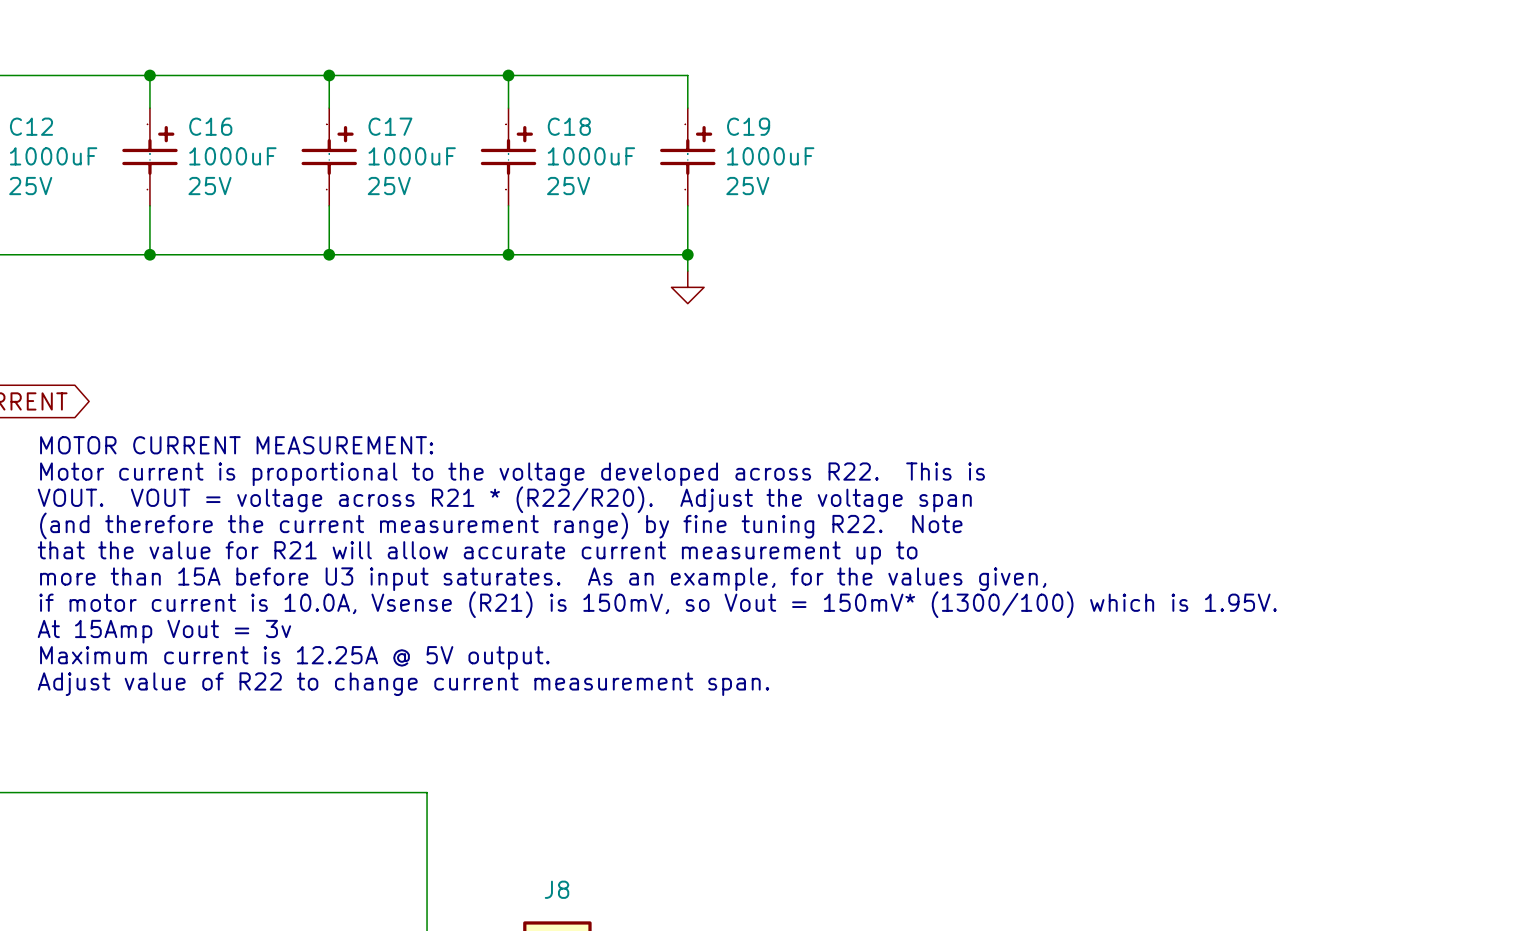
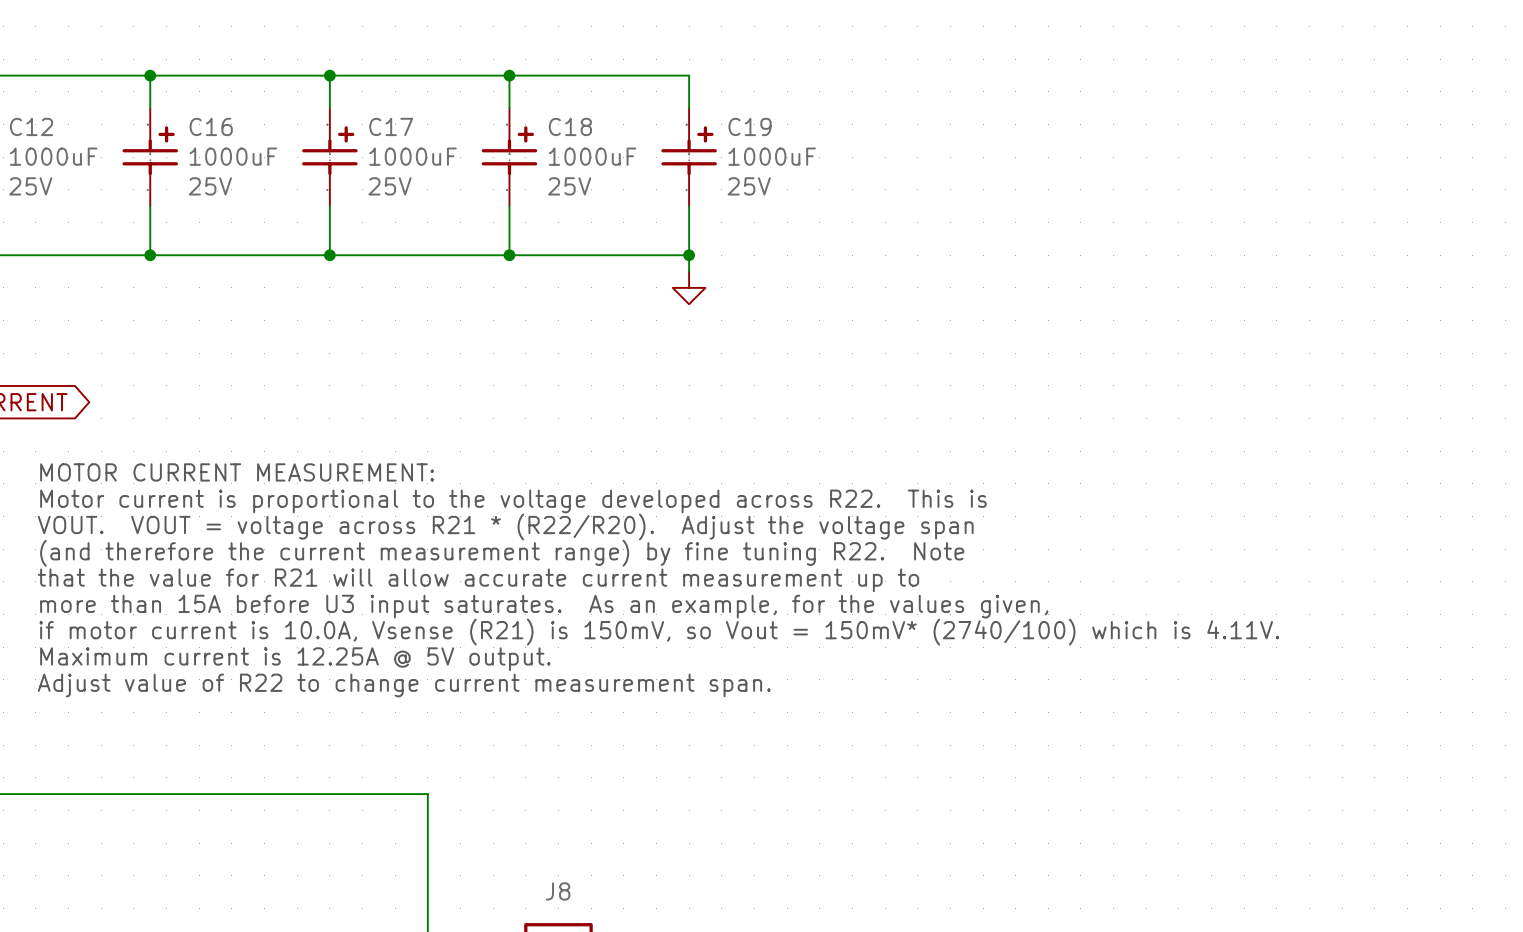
text: MOTOR CURRENT MEASUREMENT: (236, 445) -> none
text: Motor current is proportional to the voltage developed across R22. This is (512, 474) -> MOTOR CURRENT MEASUREMENT: (237, 472)
text: VOUT. VOUT = voltage across R21 * (R22/R20). Adjust the voltage span (504, 499) -> Motor current is proportional to the voltage developed across R22. This is (513, 501)
text: (and therefore the current measurement range) by fine tuning R22. Note (501, 525) -> VOUT. VOUT = voltage across R21 * (R22/R20). Adjust the voltage span (505, 526)
text: that the value for R21 will allow accurate current measurement up to (477, 552) -> (and therefore the current measurement range) by fine tuning R22. Note (502, 553)
text: more than 15A before U3 input saturates. As an example, for the values given, (543, 579) -> that the value for R21 will allow accurate current measurement up to (478, 580)
text: if motor current is 10.0A, Vsense (R21) is 150mV, so Vout = 150mV* (1300/100) which is 1.95V. (658, 604) -> more than 15A before U3 input saturates. As an example, for the values given, (544, 606)
text: At 15Amp Vout = 3v (164, 631) -> if motor current is 10.0A, Vsense (R21) is 150mV, so Vout = 150mV* (2740/100) which is 4.11V. (659, 632)

